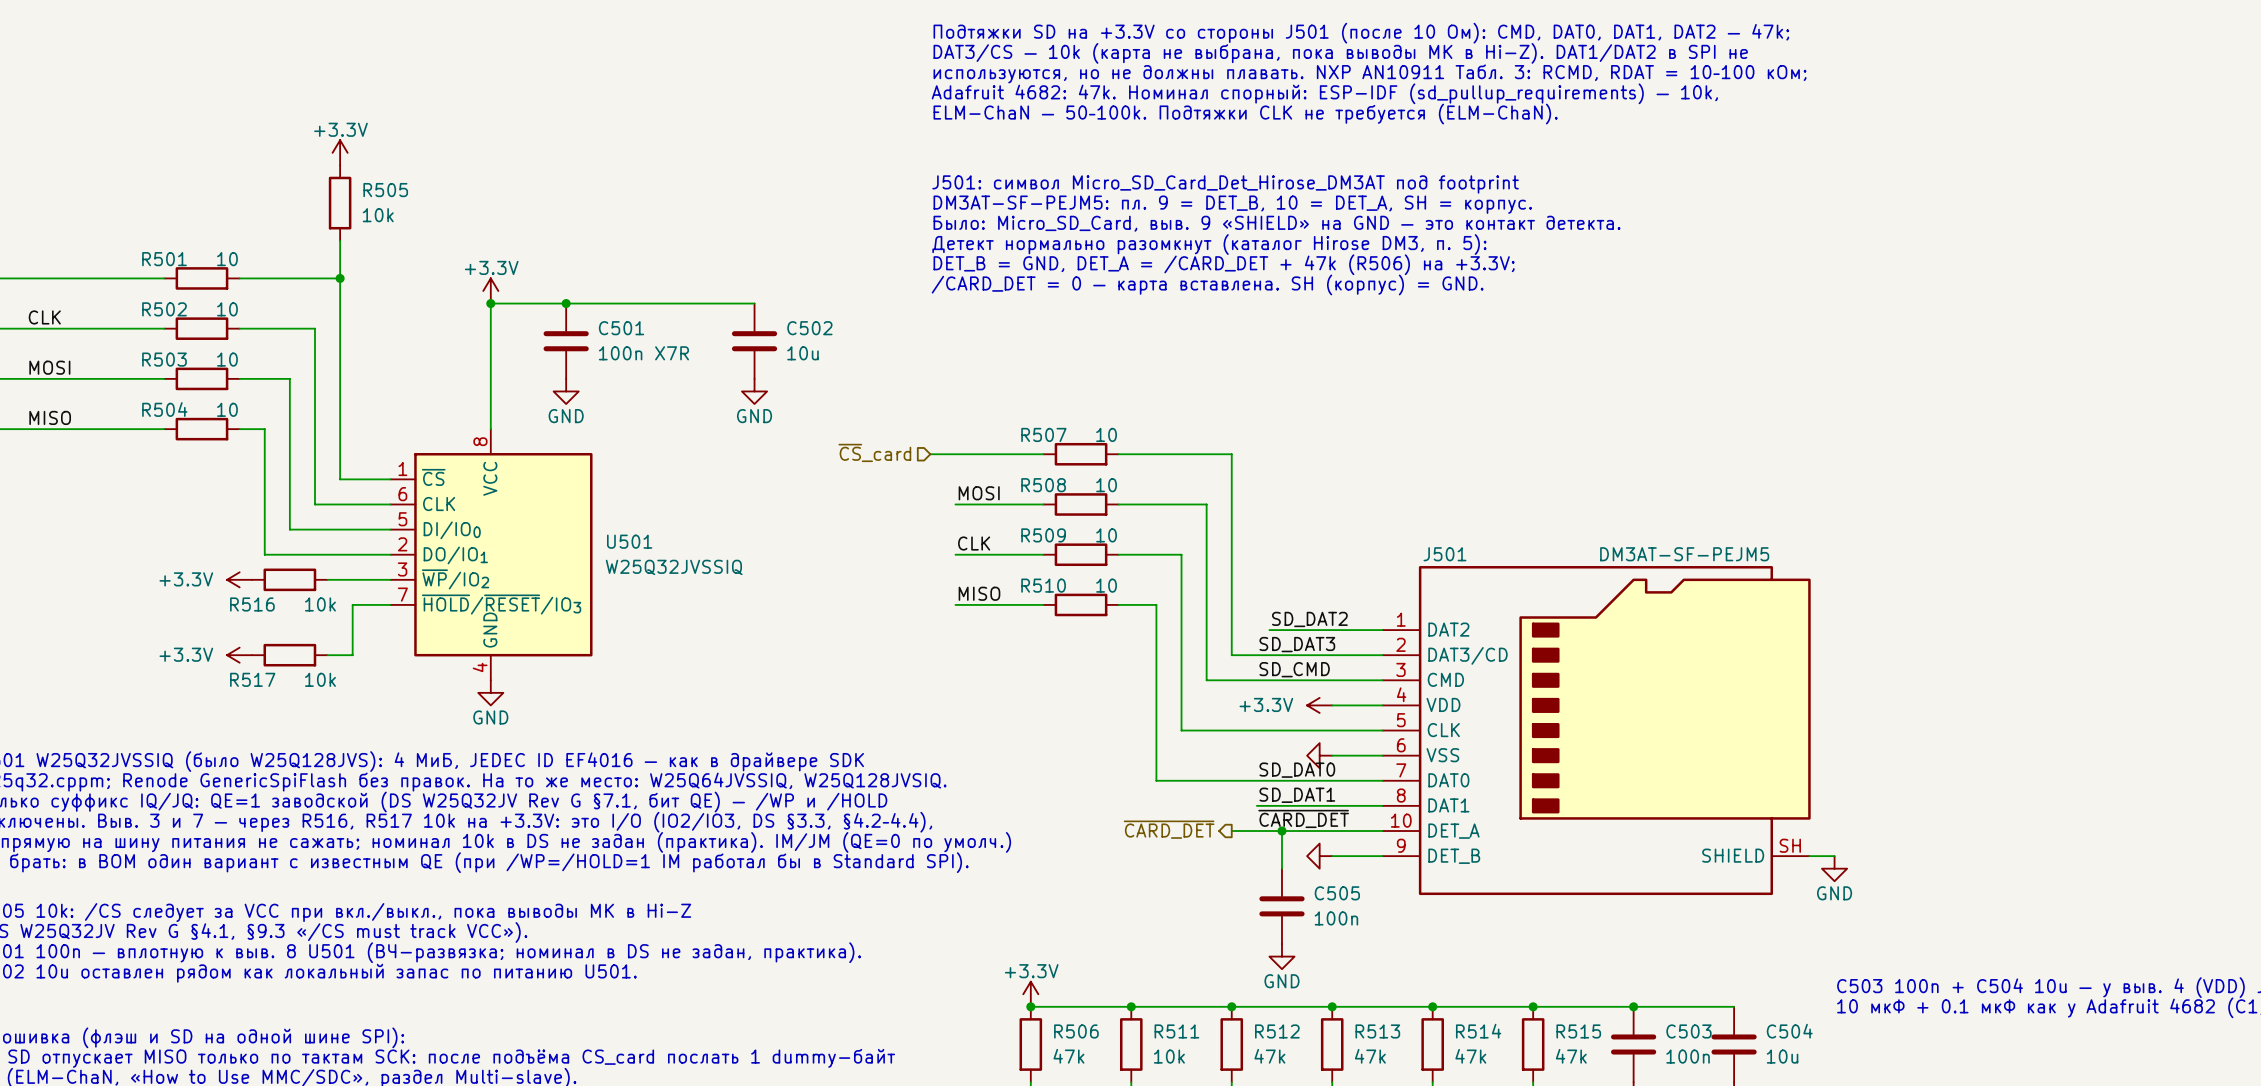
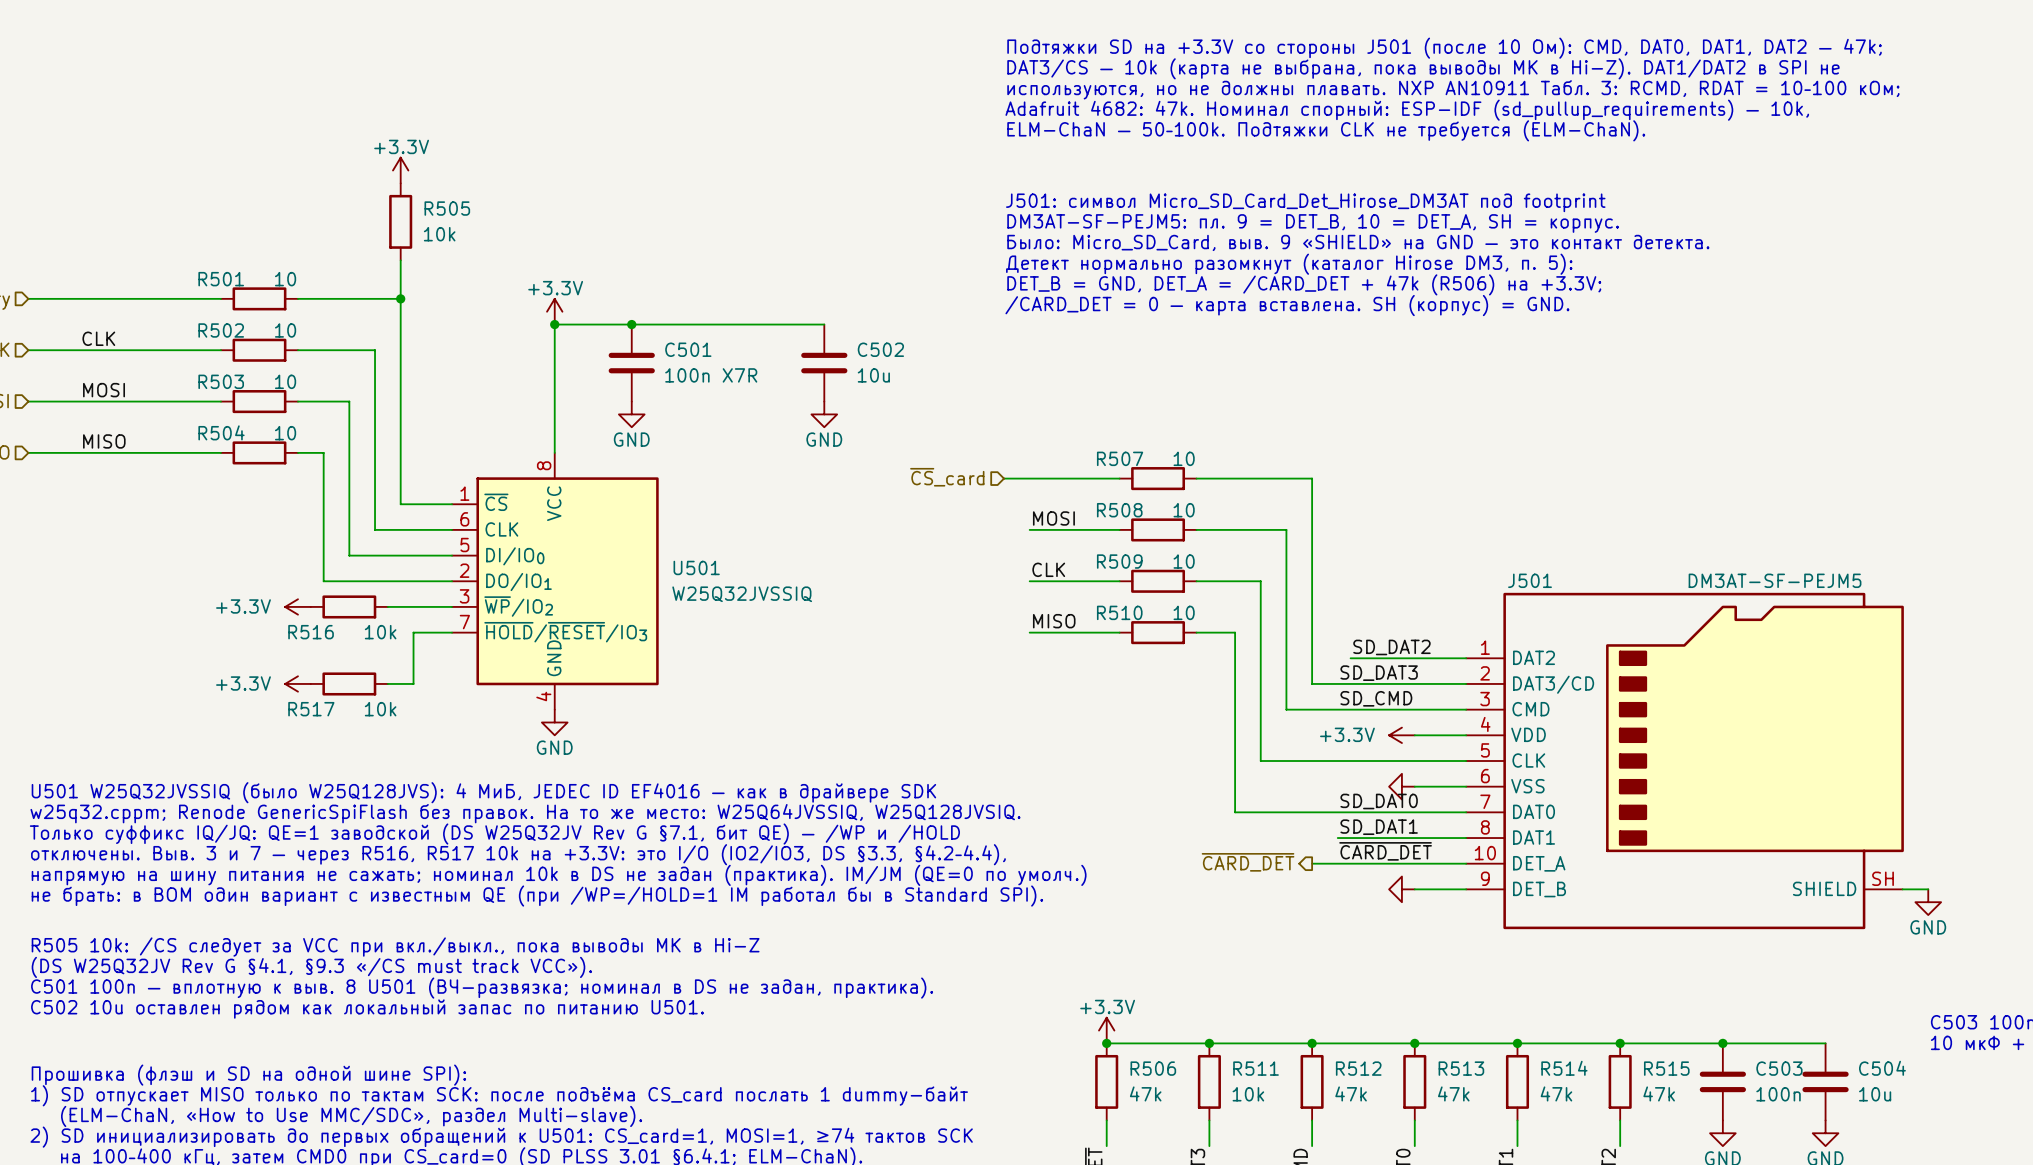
wire: (1281, 831) (1281, 868) -> none
junction: (1281, 831) -> none
C505: 100n (1281, 906) -> none
power symbol: GND (1281, 956) -> none

